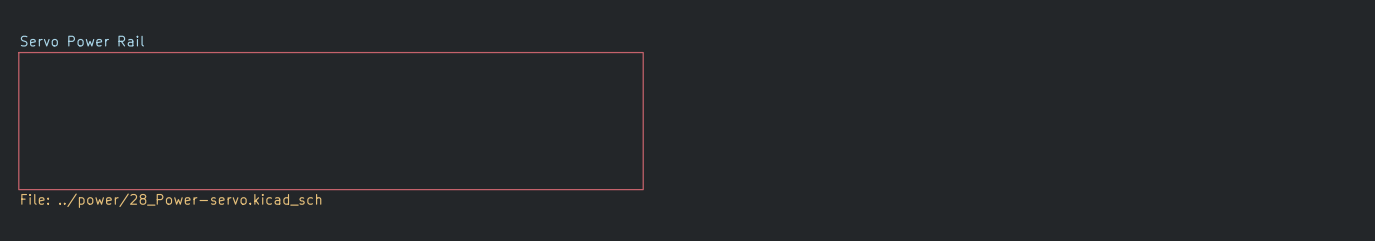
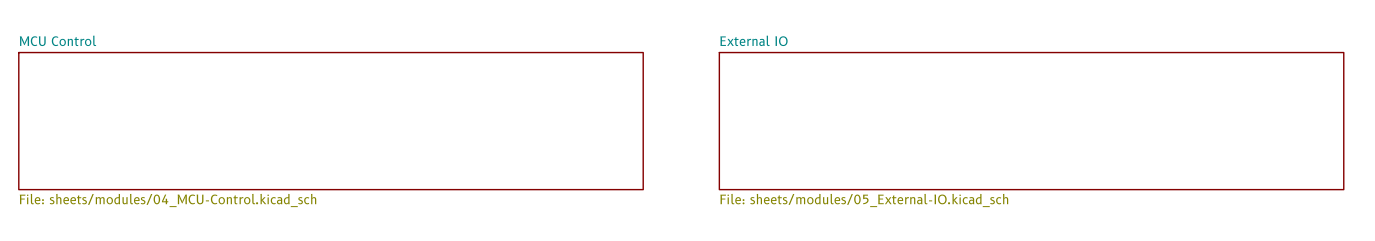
sheet Servo Power Rail name: Servo Power Rail (82, 41) -> MCU Control (58, 40)
sheet External IO: none -> File: sheets/modules/05_External-IO.kicad_sch (1031, 121)
sheet Servo Power Rail value: File: ../power/28_Power-servo.kicad_sch (171, 200) -> File: sheets/modules/04_MCU-Control.kicad_sch (168, 200)

